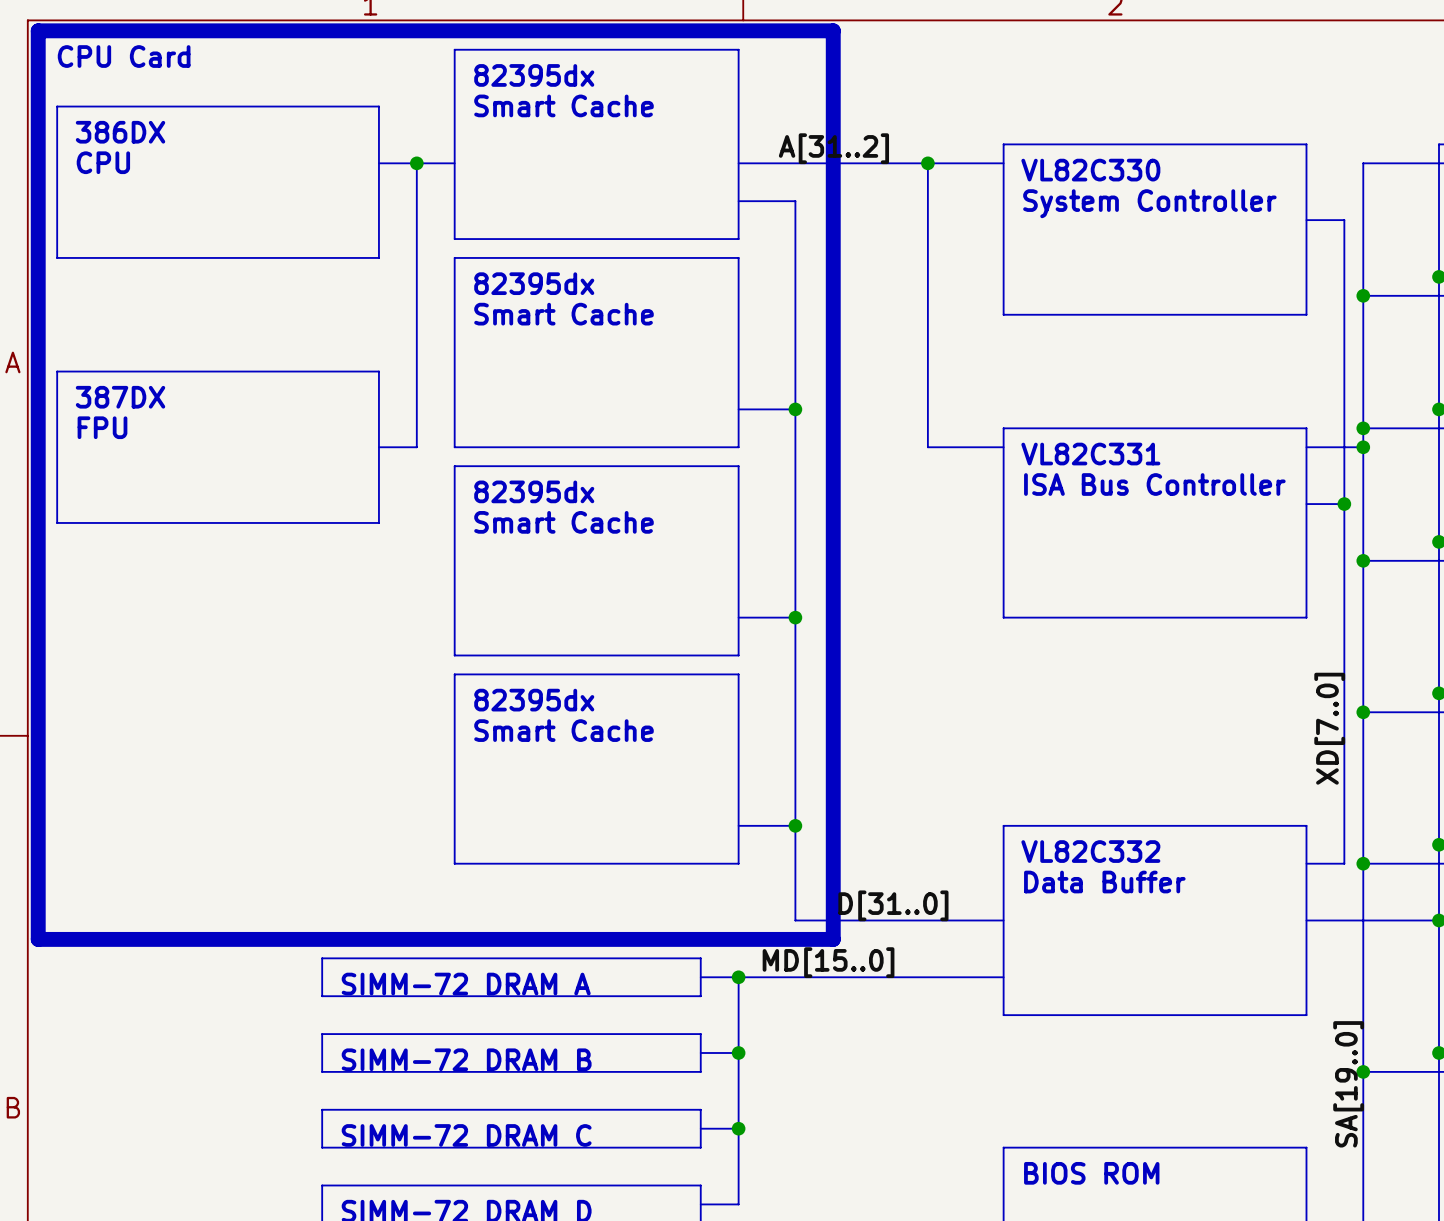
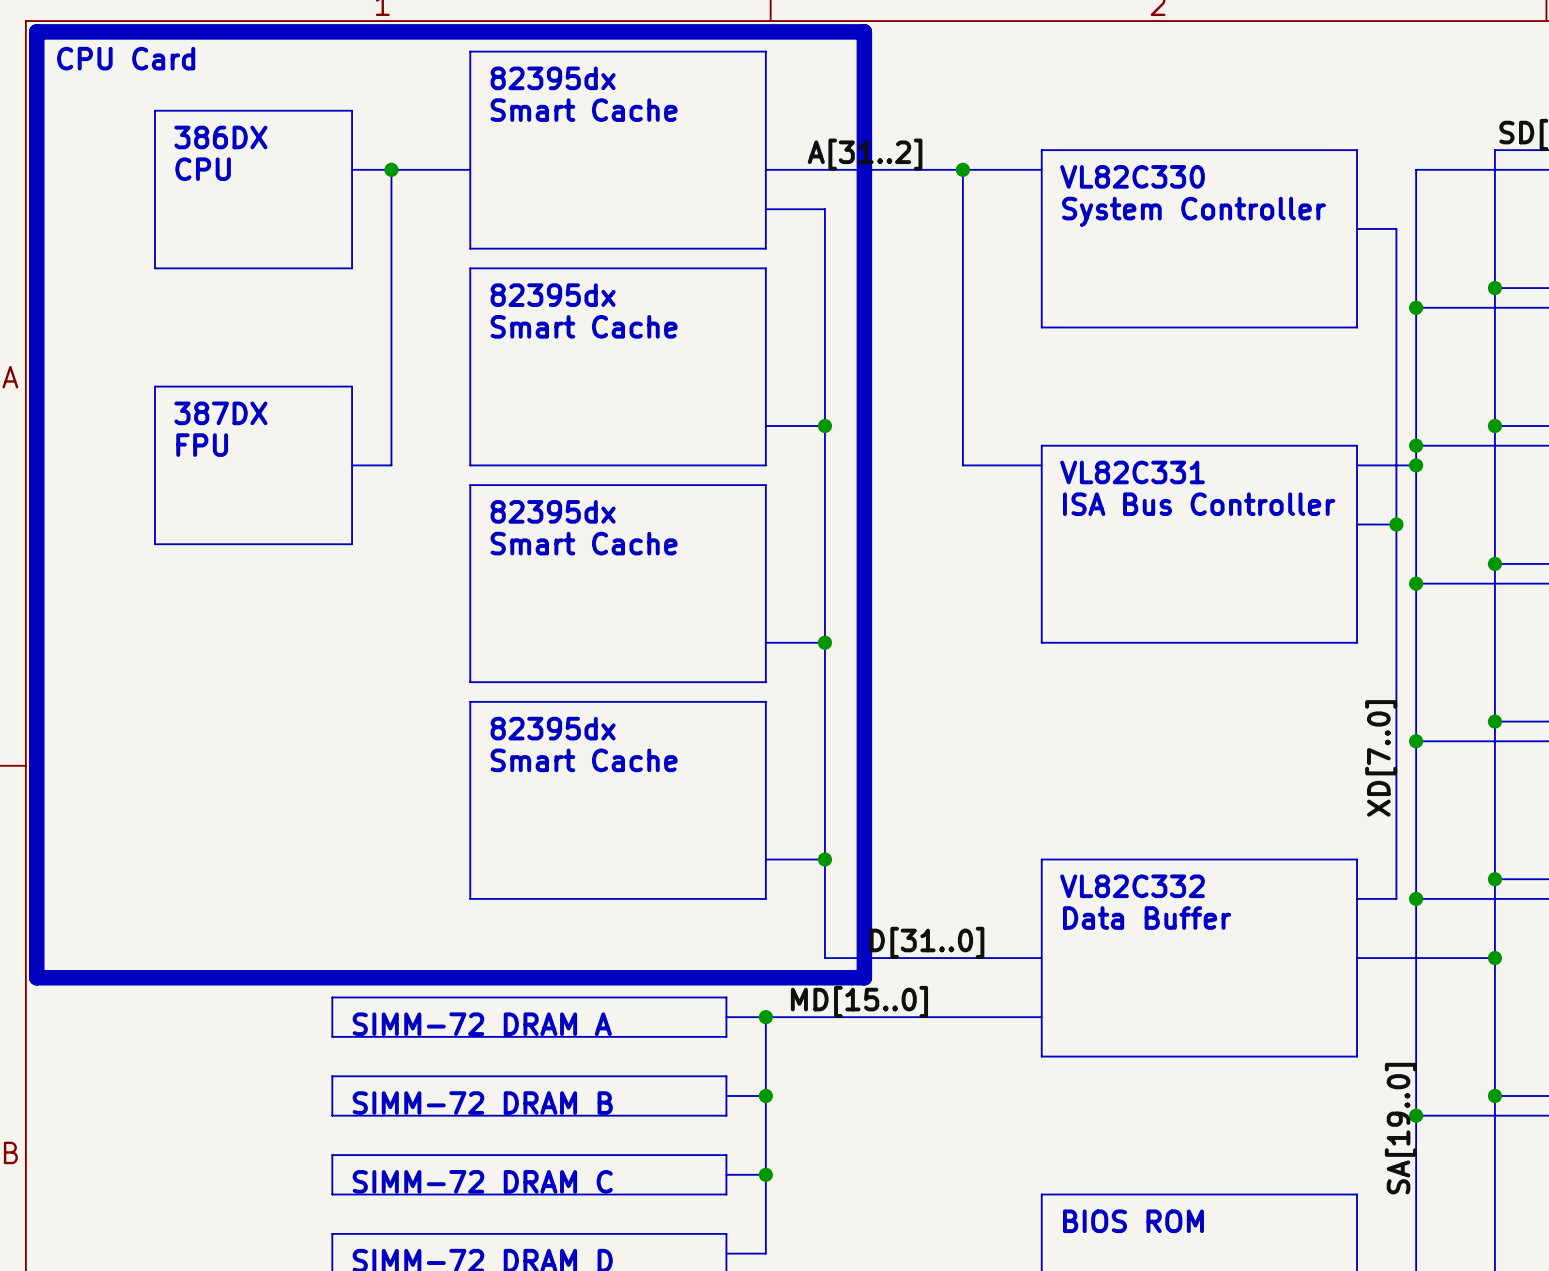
line: (151, 106) (57, 106) (57, 257) (151, 257) -> (154, 110) (154, 268)
line: (341, 106) (378, 106) (378, 257) (341, 257) -> (352, 110) (352, 268)
text position: 386DX (120, 132) -> 386DX (220, 137)
text position: CPU (103, 162) -> CPU (203, 169)
bus: none -> (352, 169) (391, 169) (391, 465) (352, 465)
bus: (416, 163) (416, 447) (378, 447) -> none
junction position: (416, 163) -> (391, 169)
line: (151, 371) (57, 371) (57, 522) (151, 522) -> (154, 386) (154, 544)
line: (341, 371) (378, 371) (378, 522) (341, 522) -> (352, 386) (352, 544)
text position: 387DX (120, 397) -> 387DX (220, 413)
text position: FPU (102, 427) -> FPU (202, 445)

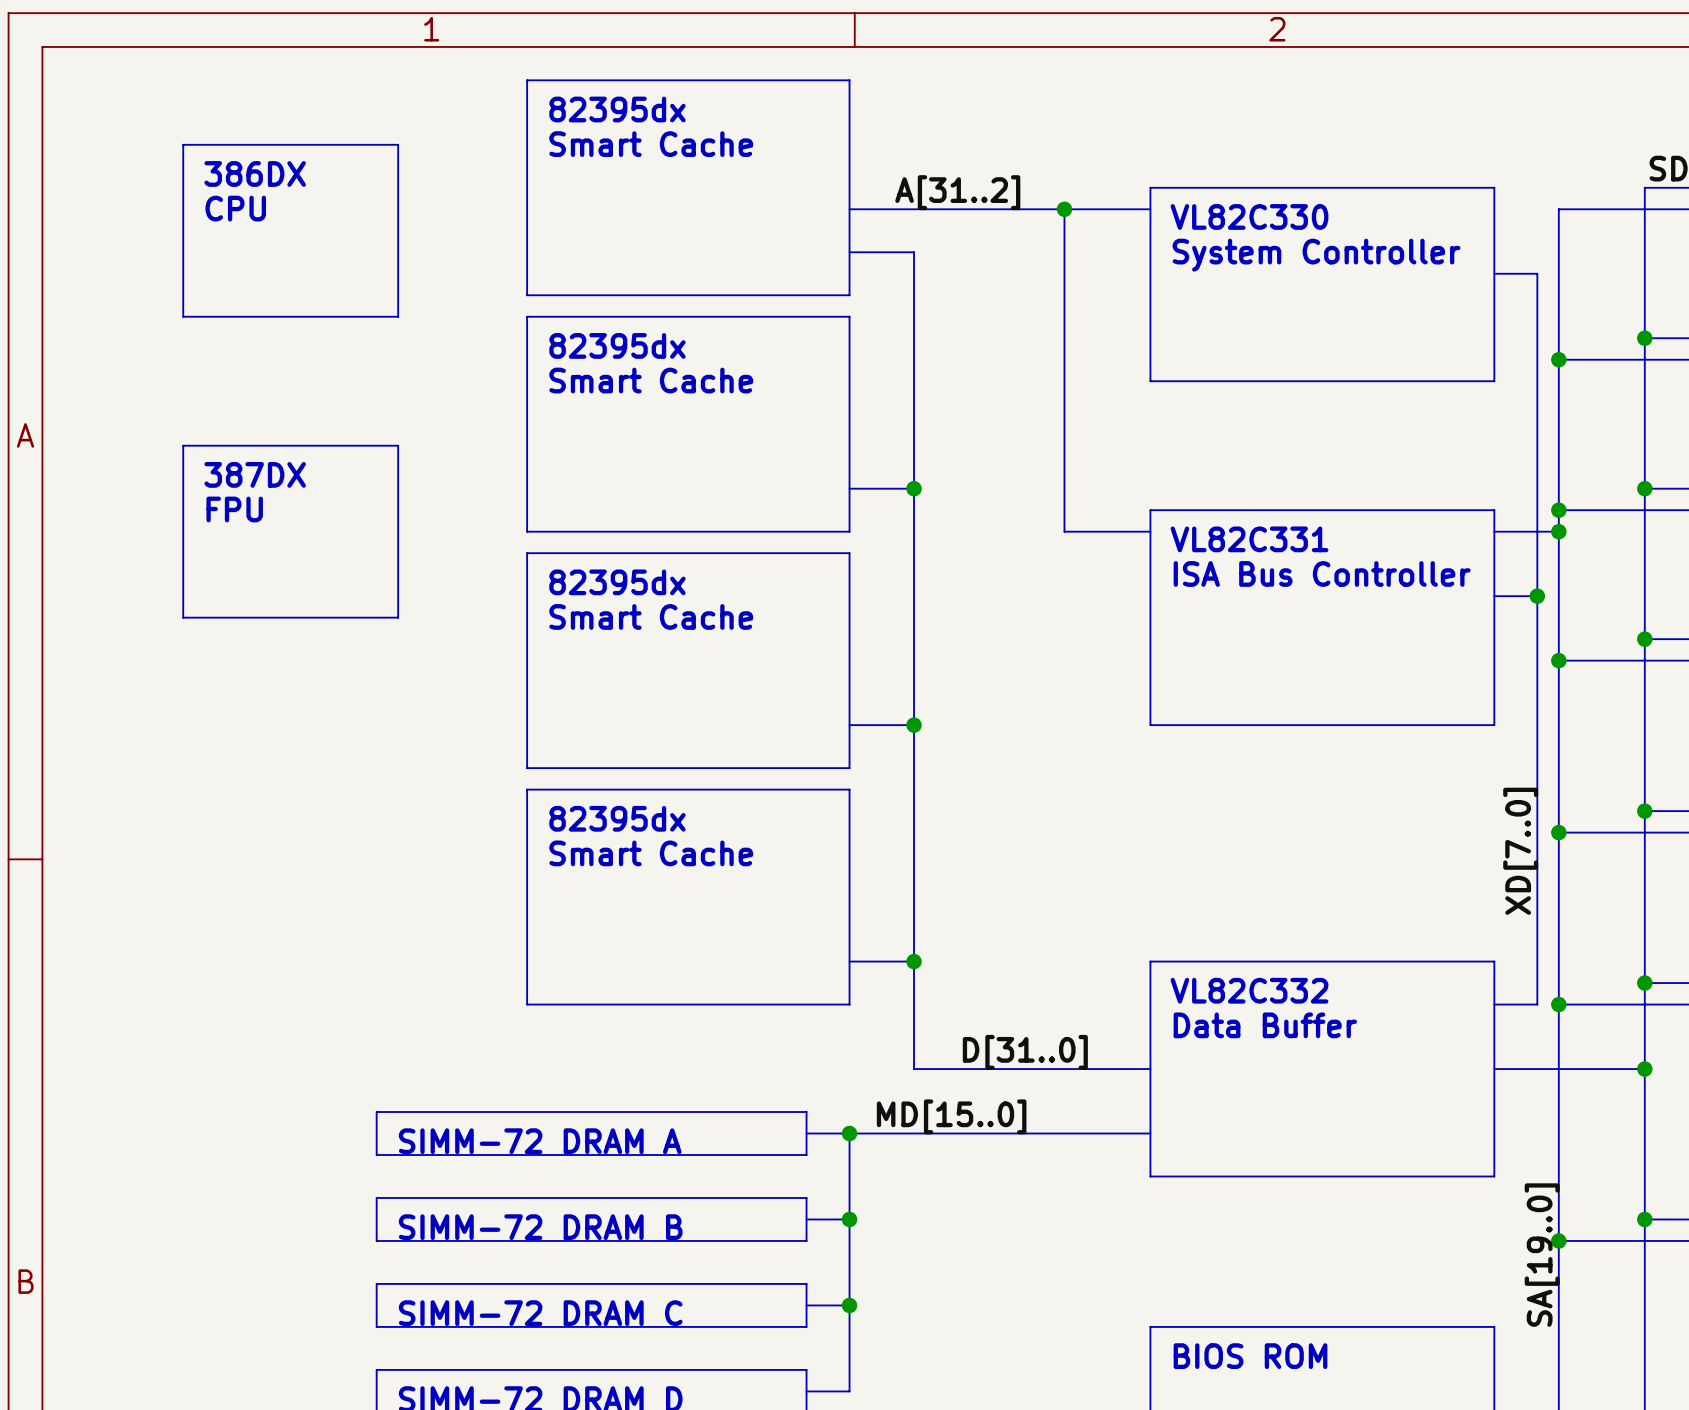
line: (36, 31) (864, 31) (864, 977) (36, 977) (36, 31) -> none
text: CPU Card (126, 58) -> none
bus: (352, 169) (470, 169) -> none
bus: (391, 169) (391, 465) (352, 465) -> none
junction: (391, 169) -> none

